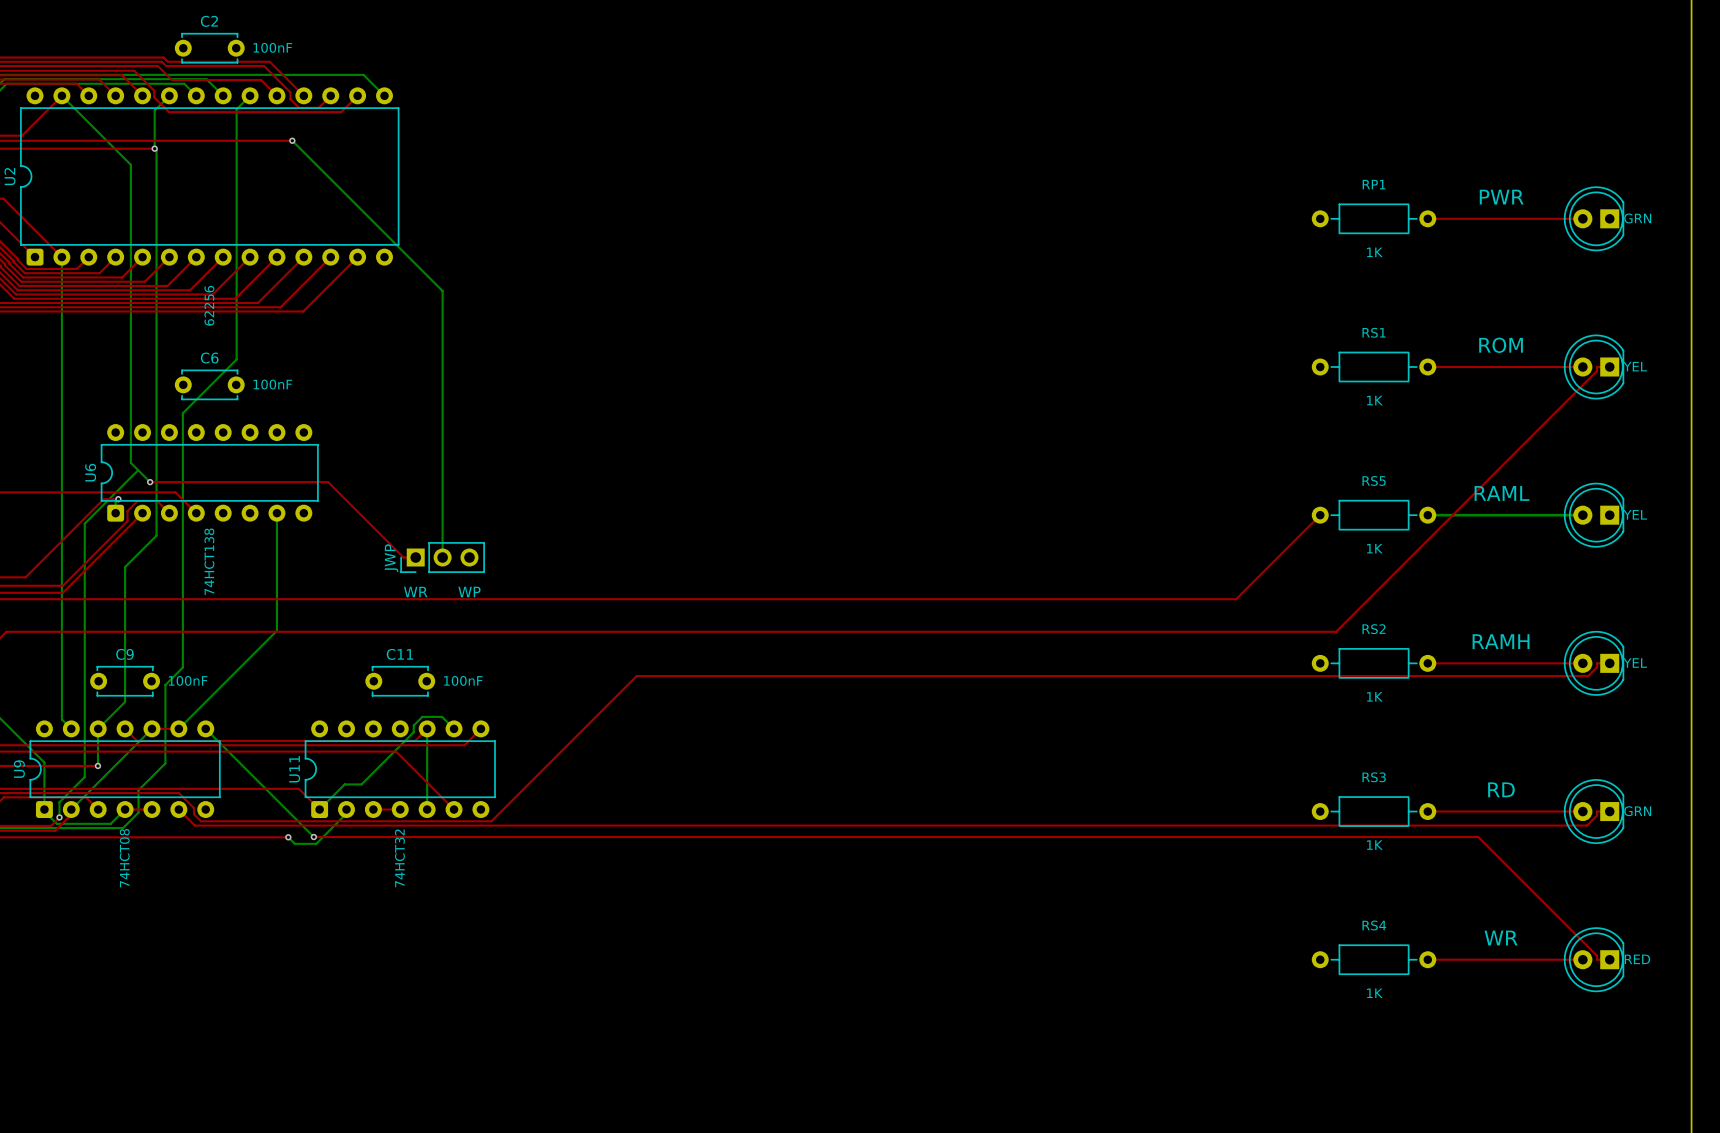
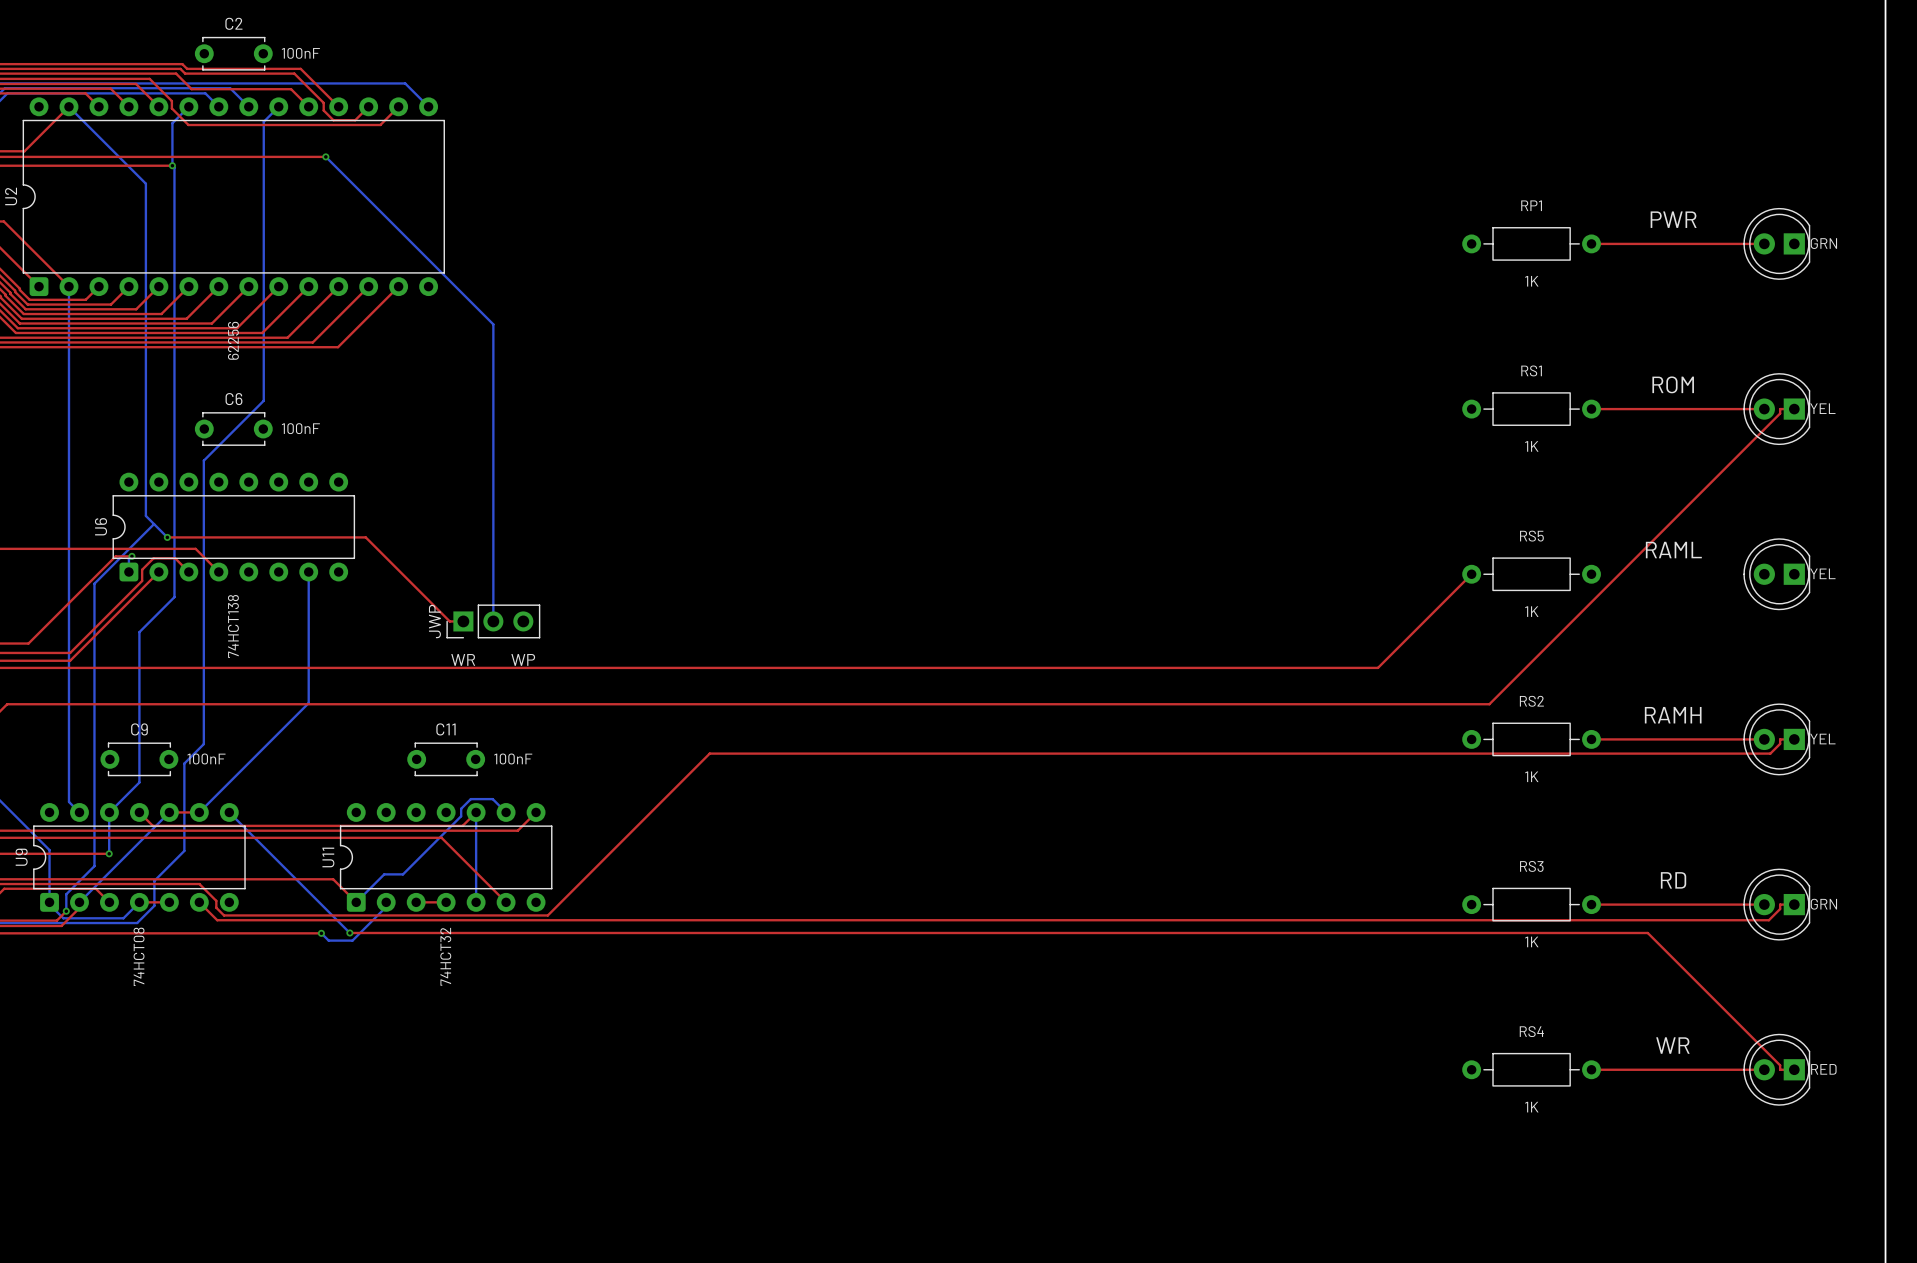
bottom track: (1427, 515) (1582, 515) -> none

